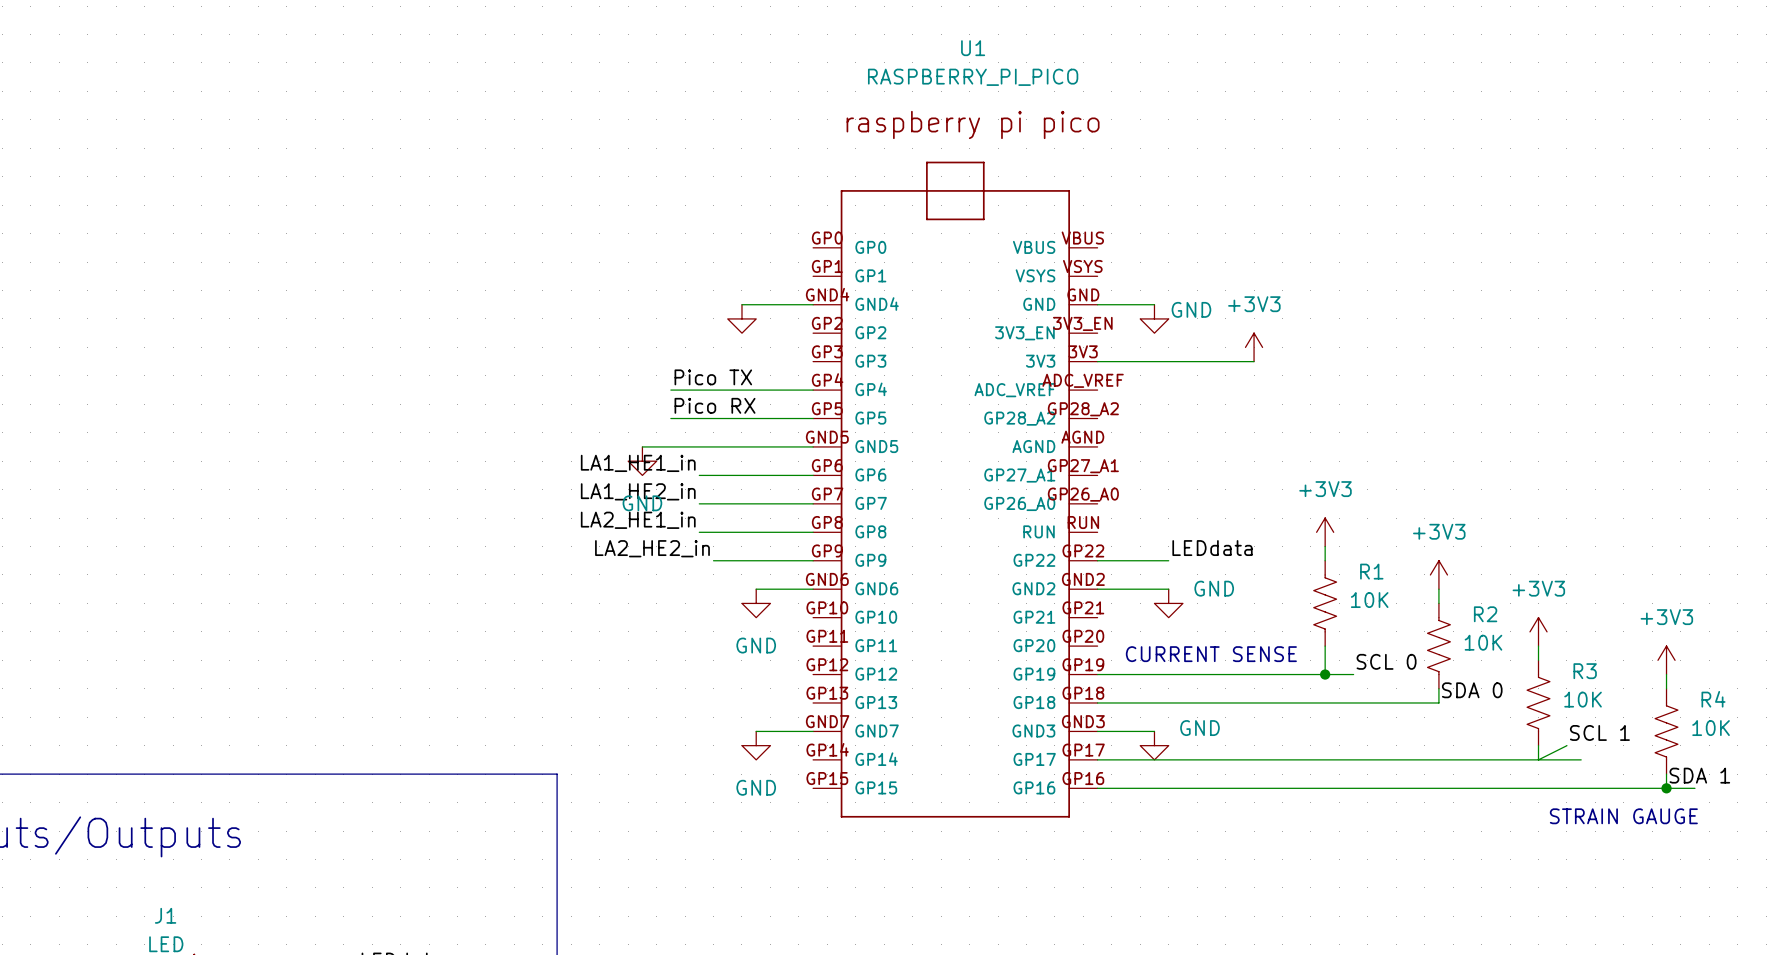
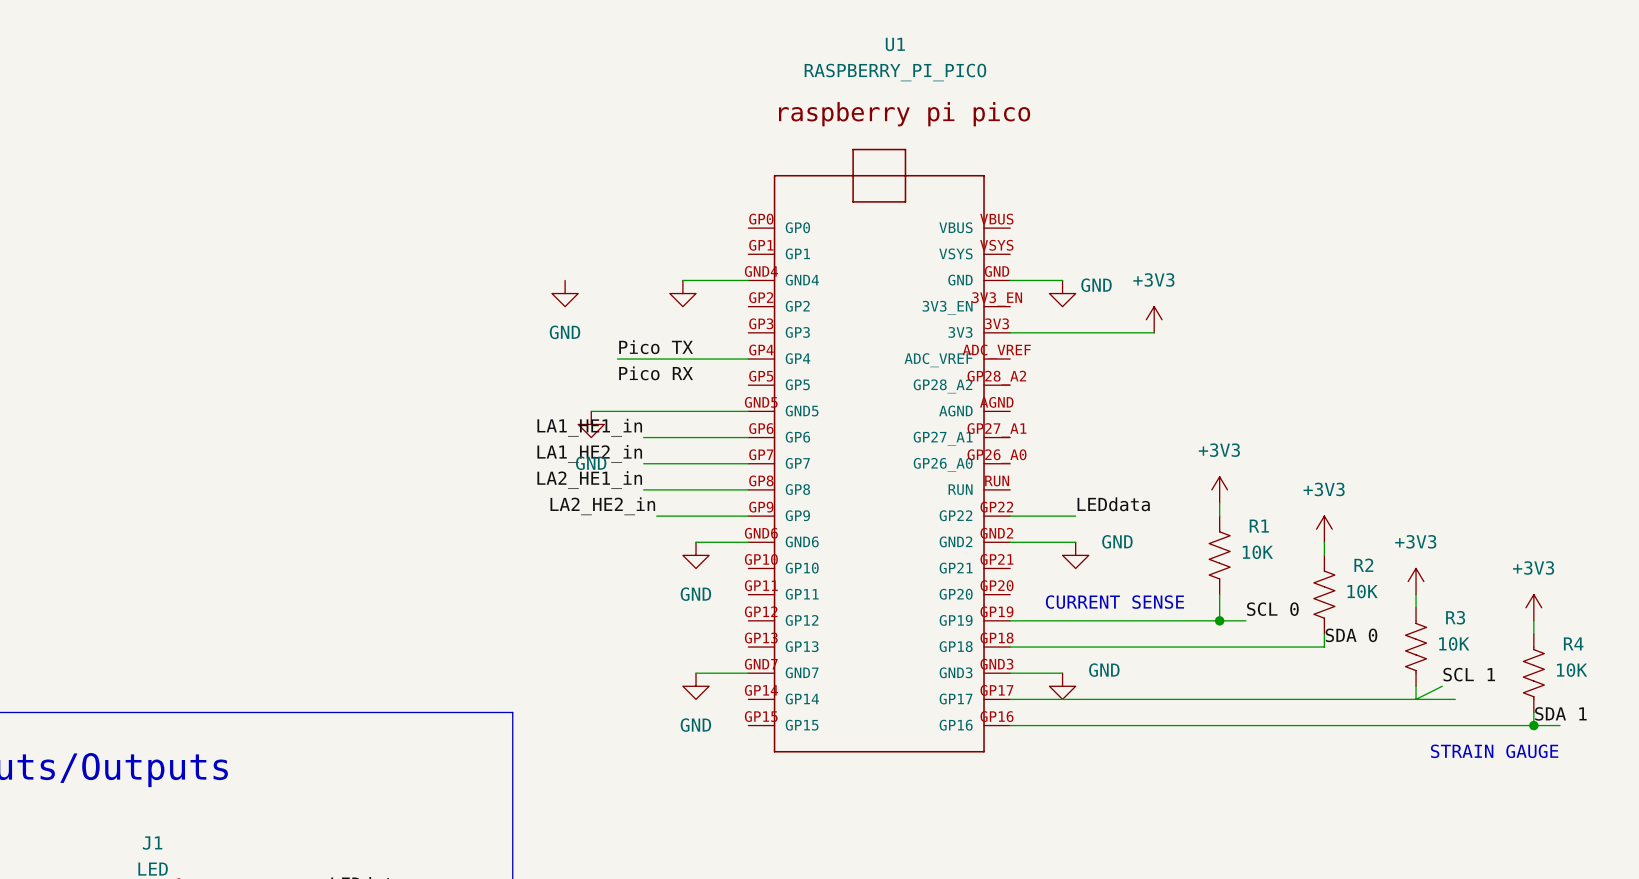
power symbol: none -> GND (565, 293)
wire: (670, 418) (813, 418) -> none

